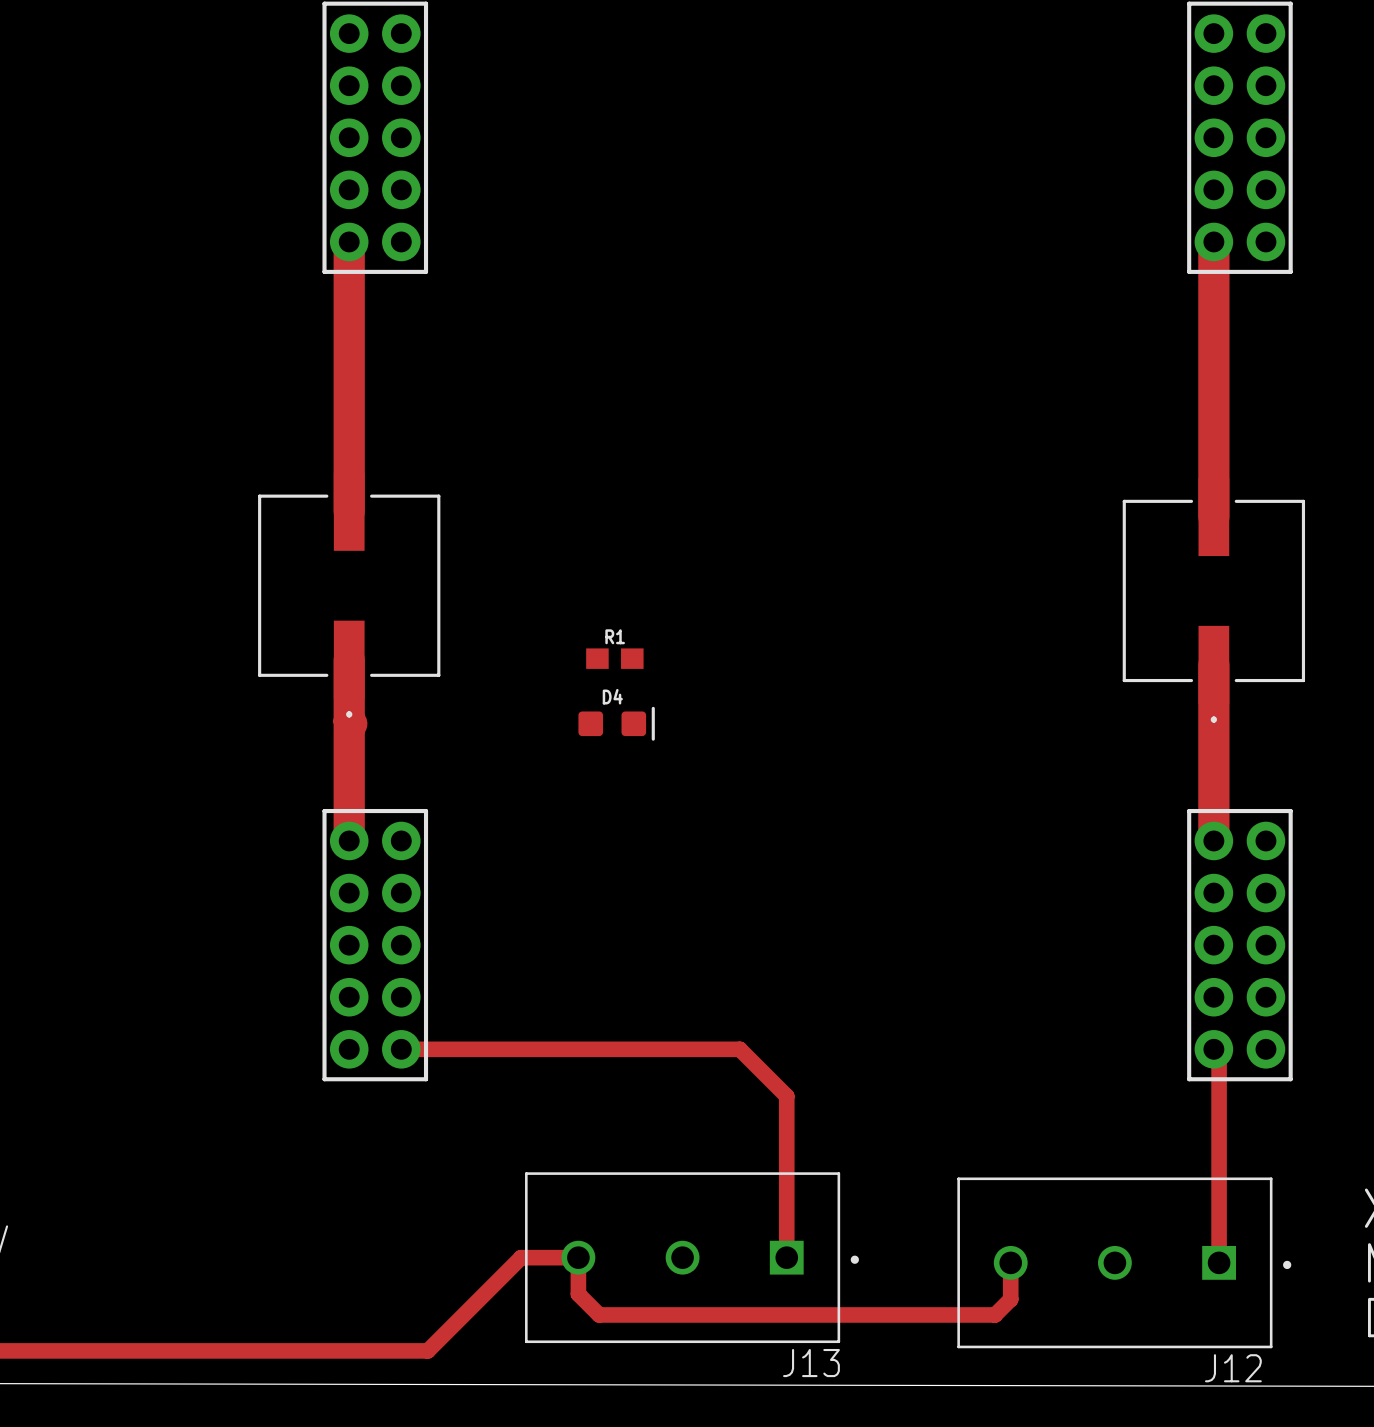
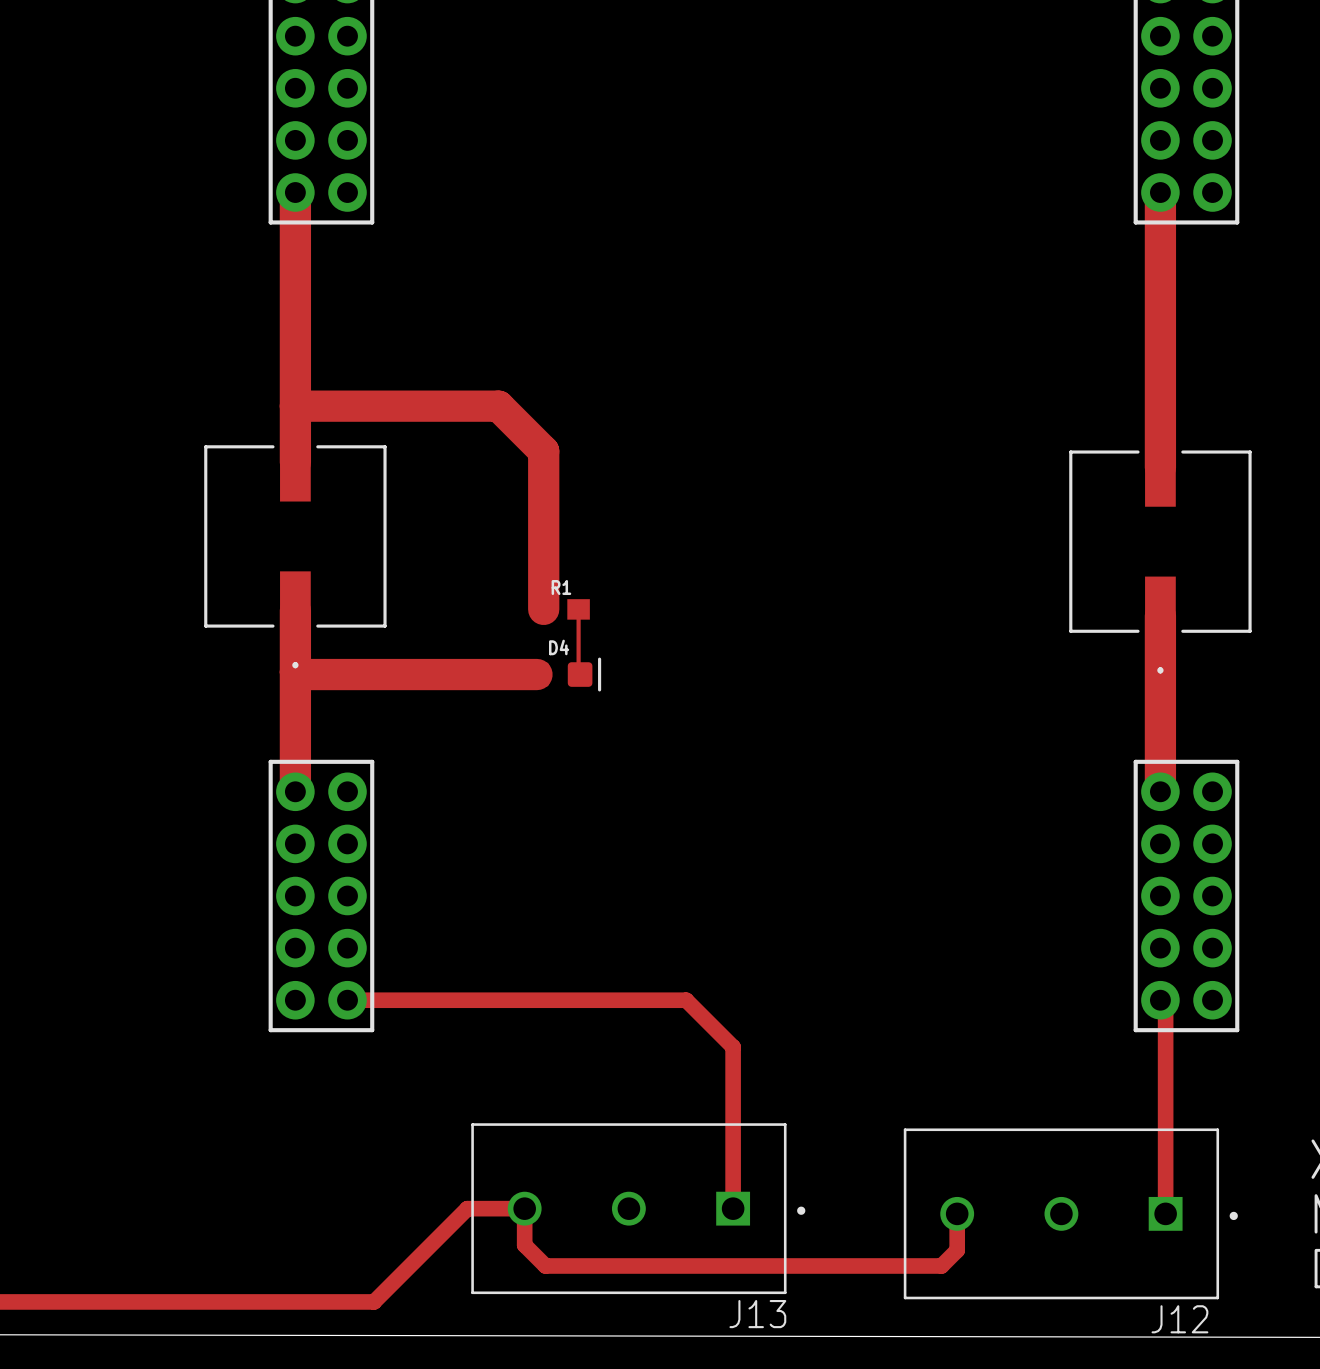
track: none -> (295, 406) (498, 406) (543, 451) (543, 609)
track: none -> (578, 609) (580, 674)
track: none -> (298, 674) (537, 674)

